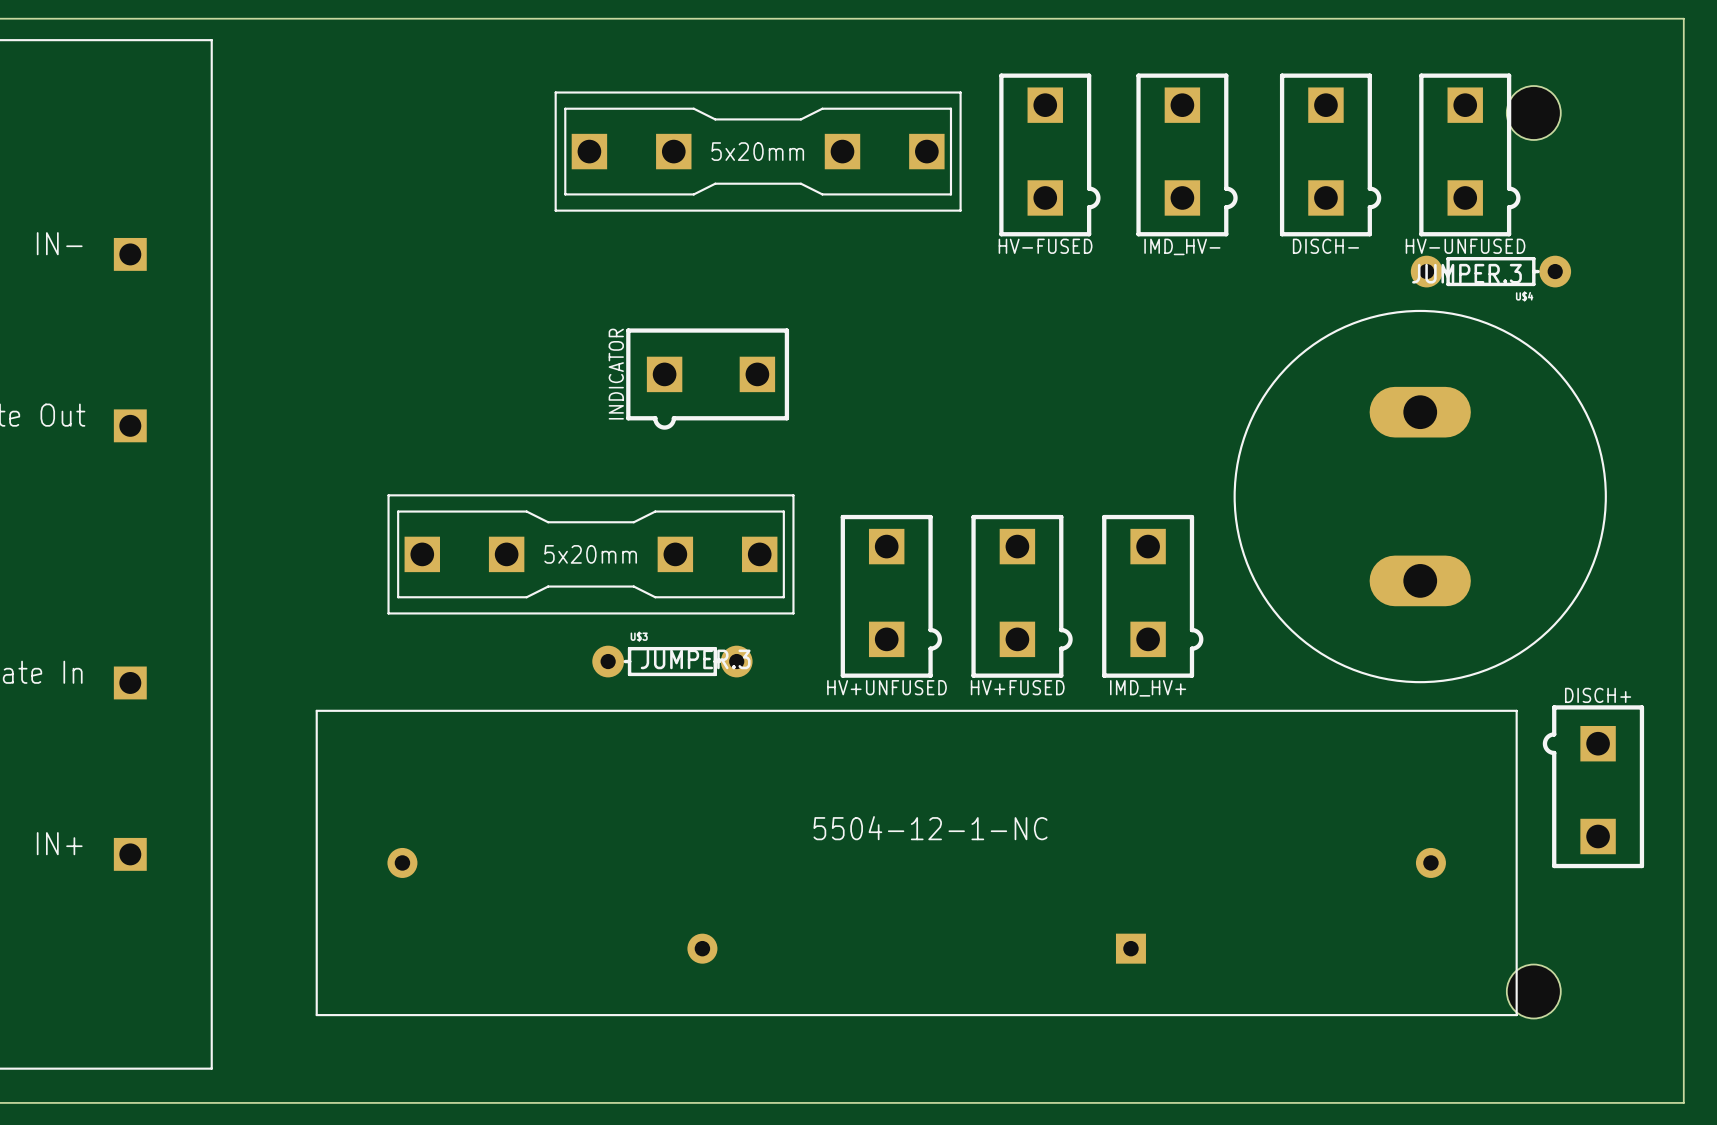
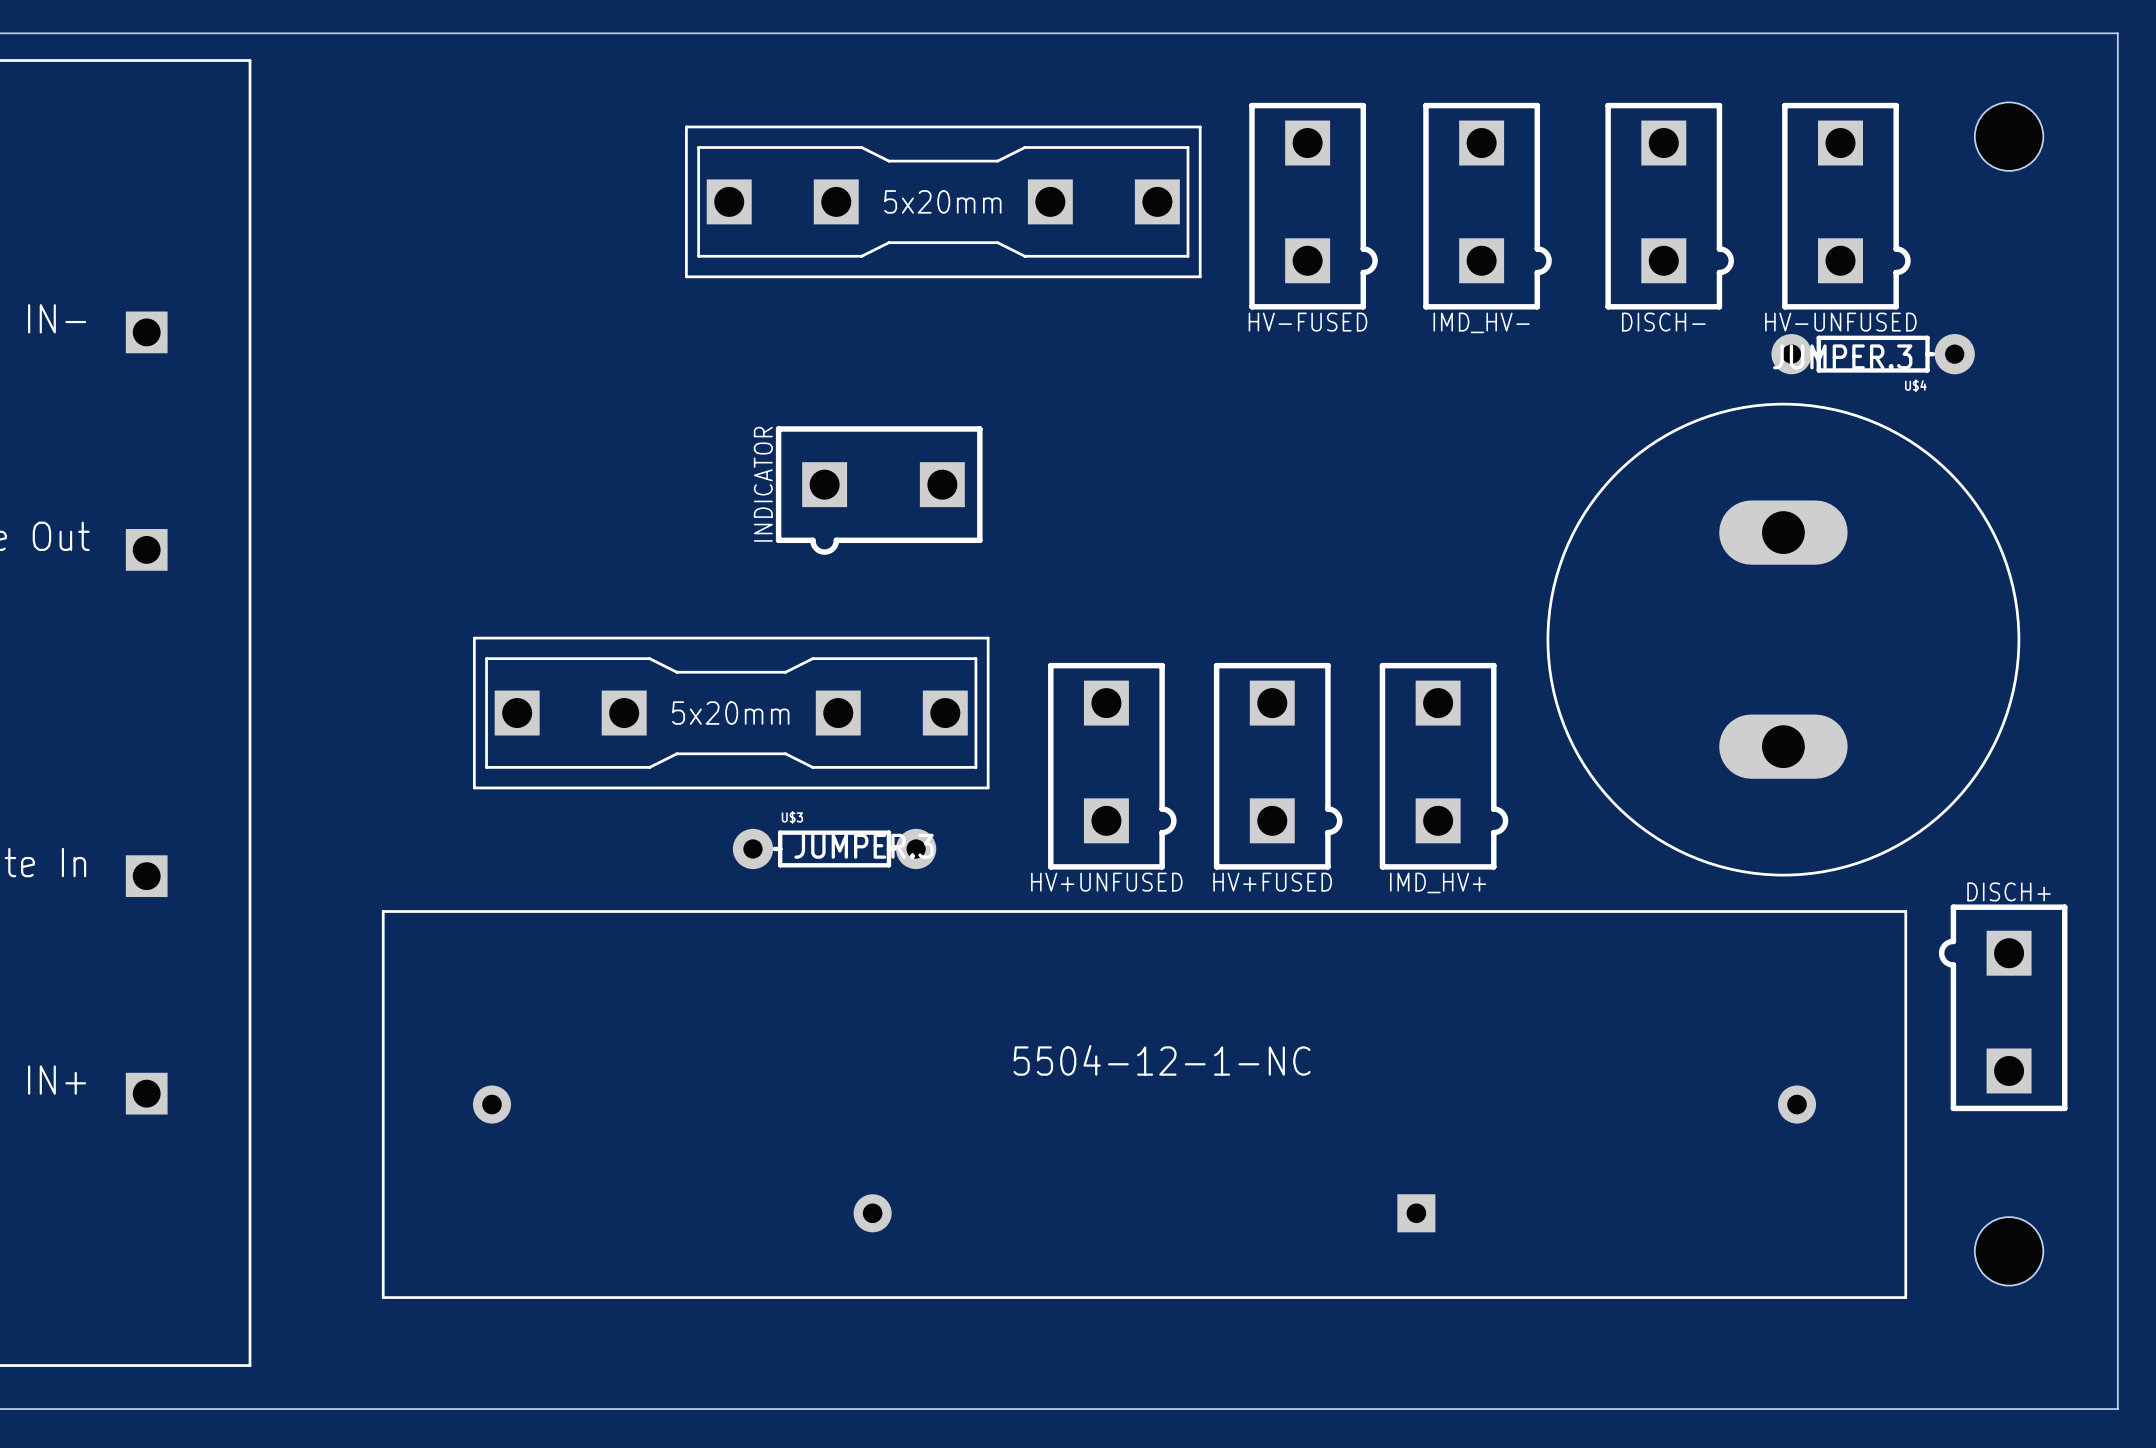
hole position: (1533, 113) -> (2009, 136)
hole position: (1533, 991) -> (2009, 1251)

